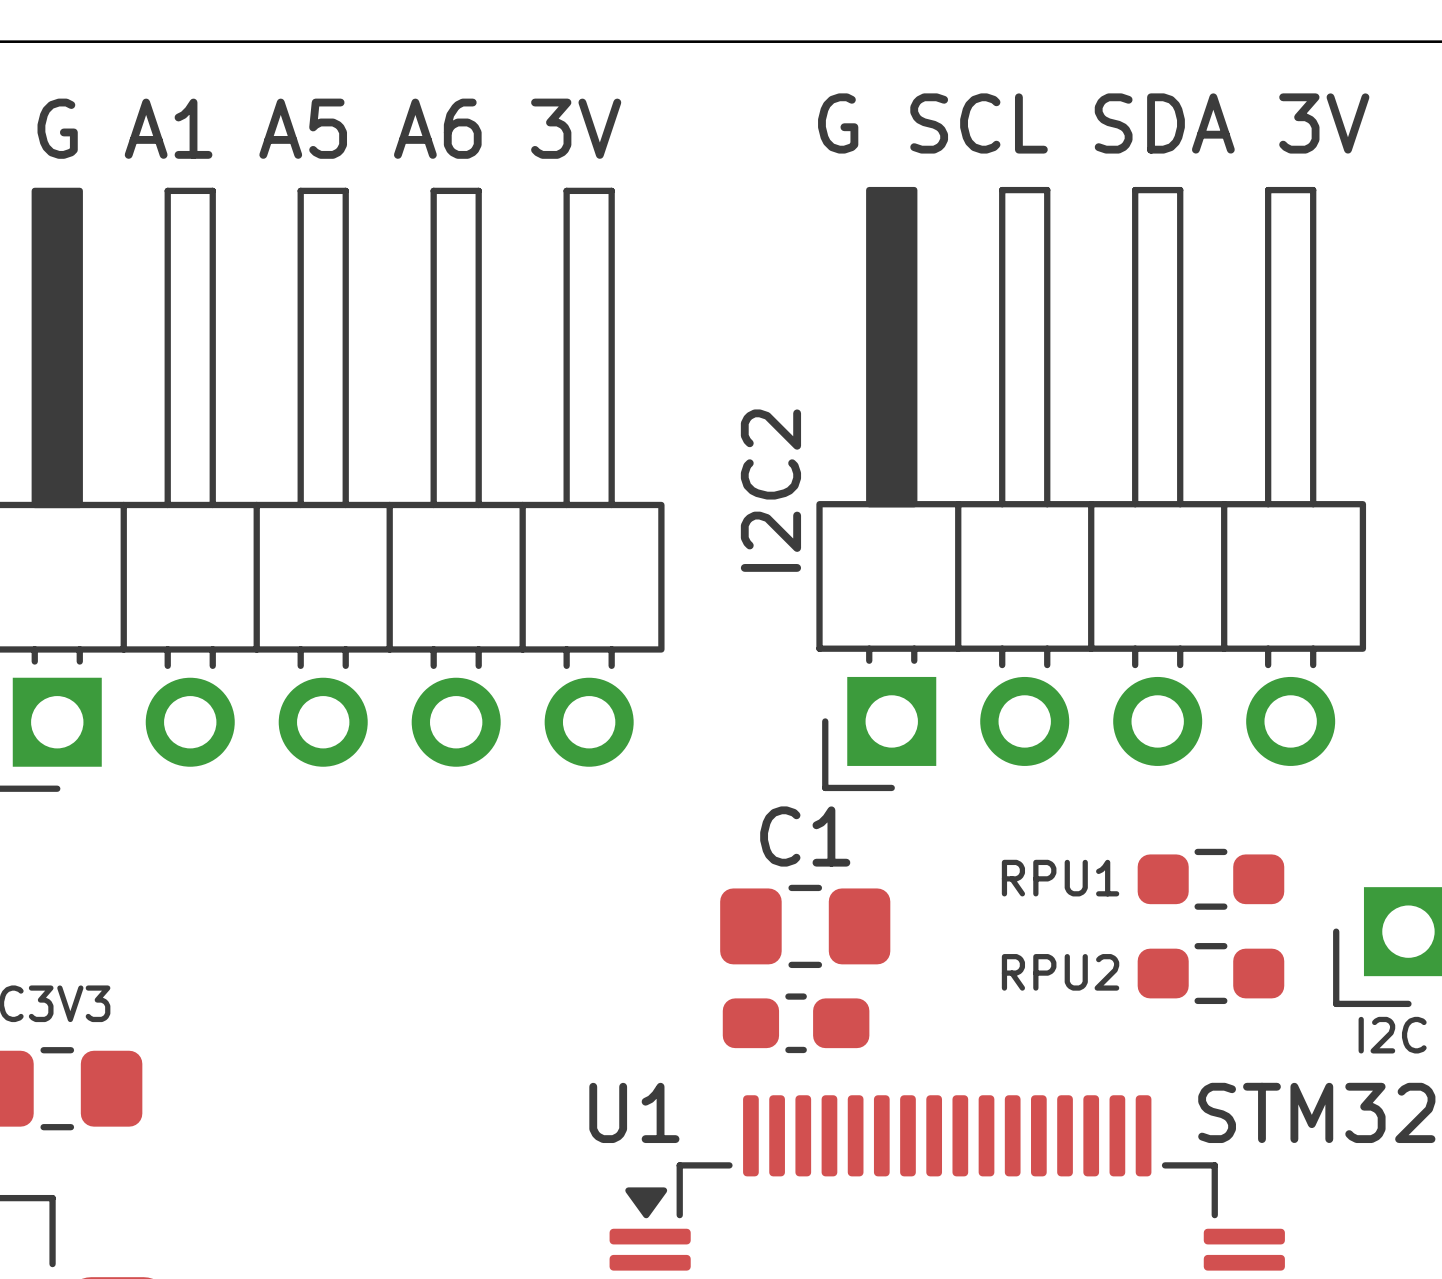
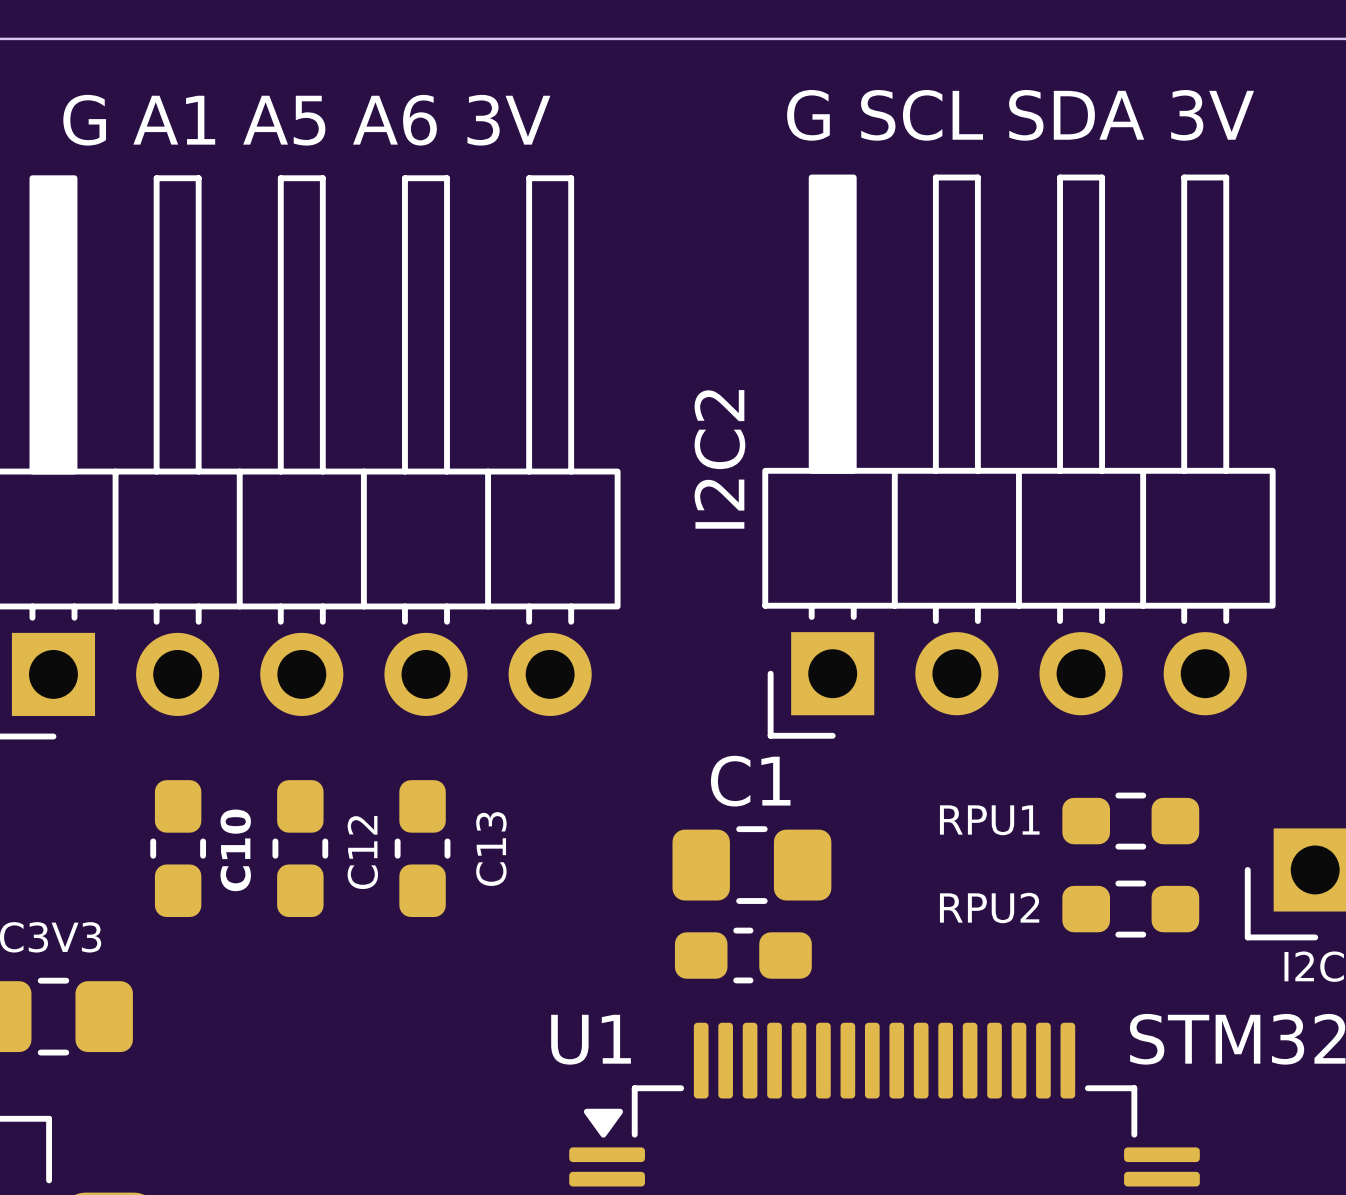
C10: none -> (178, 848)
C12: none -> (300, 848)
C13: none -> (422, 848)

